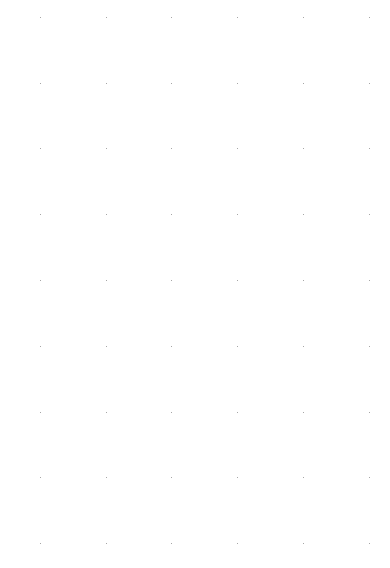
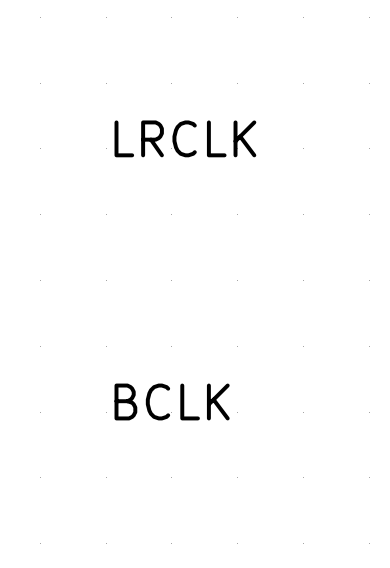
label: none -> LRCLK (185, 138)
label: none -> BCLK (172, 401)

